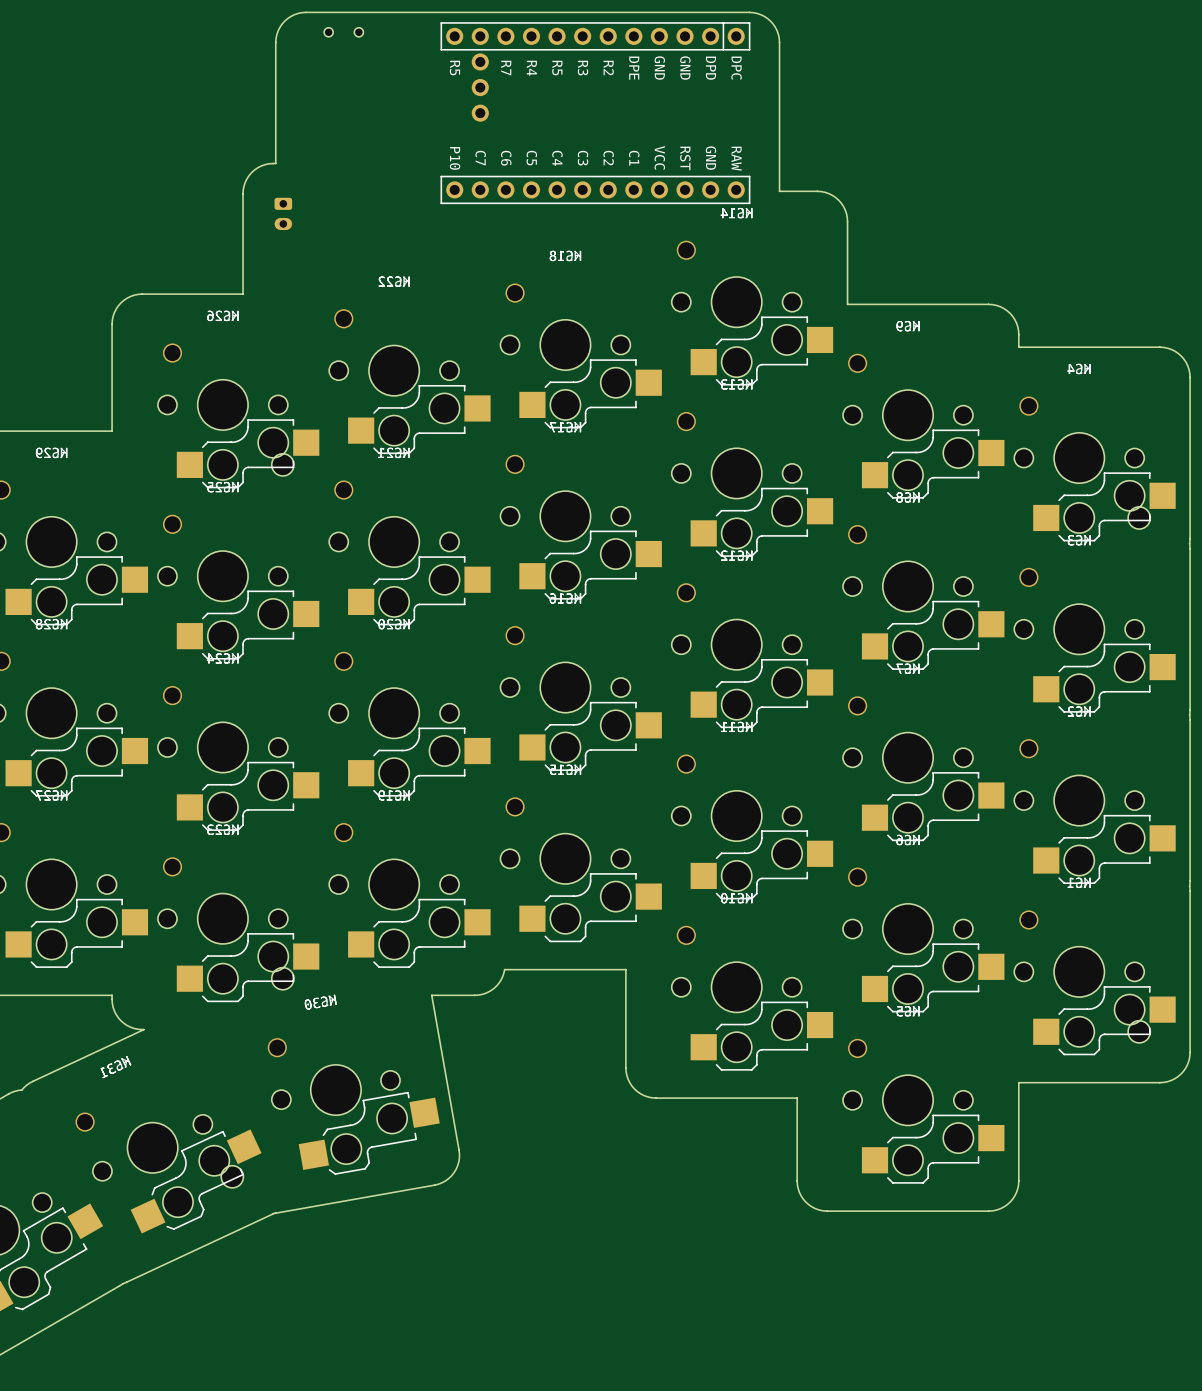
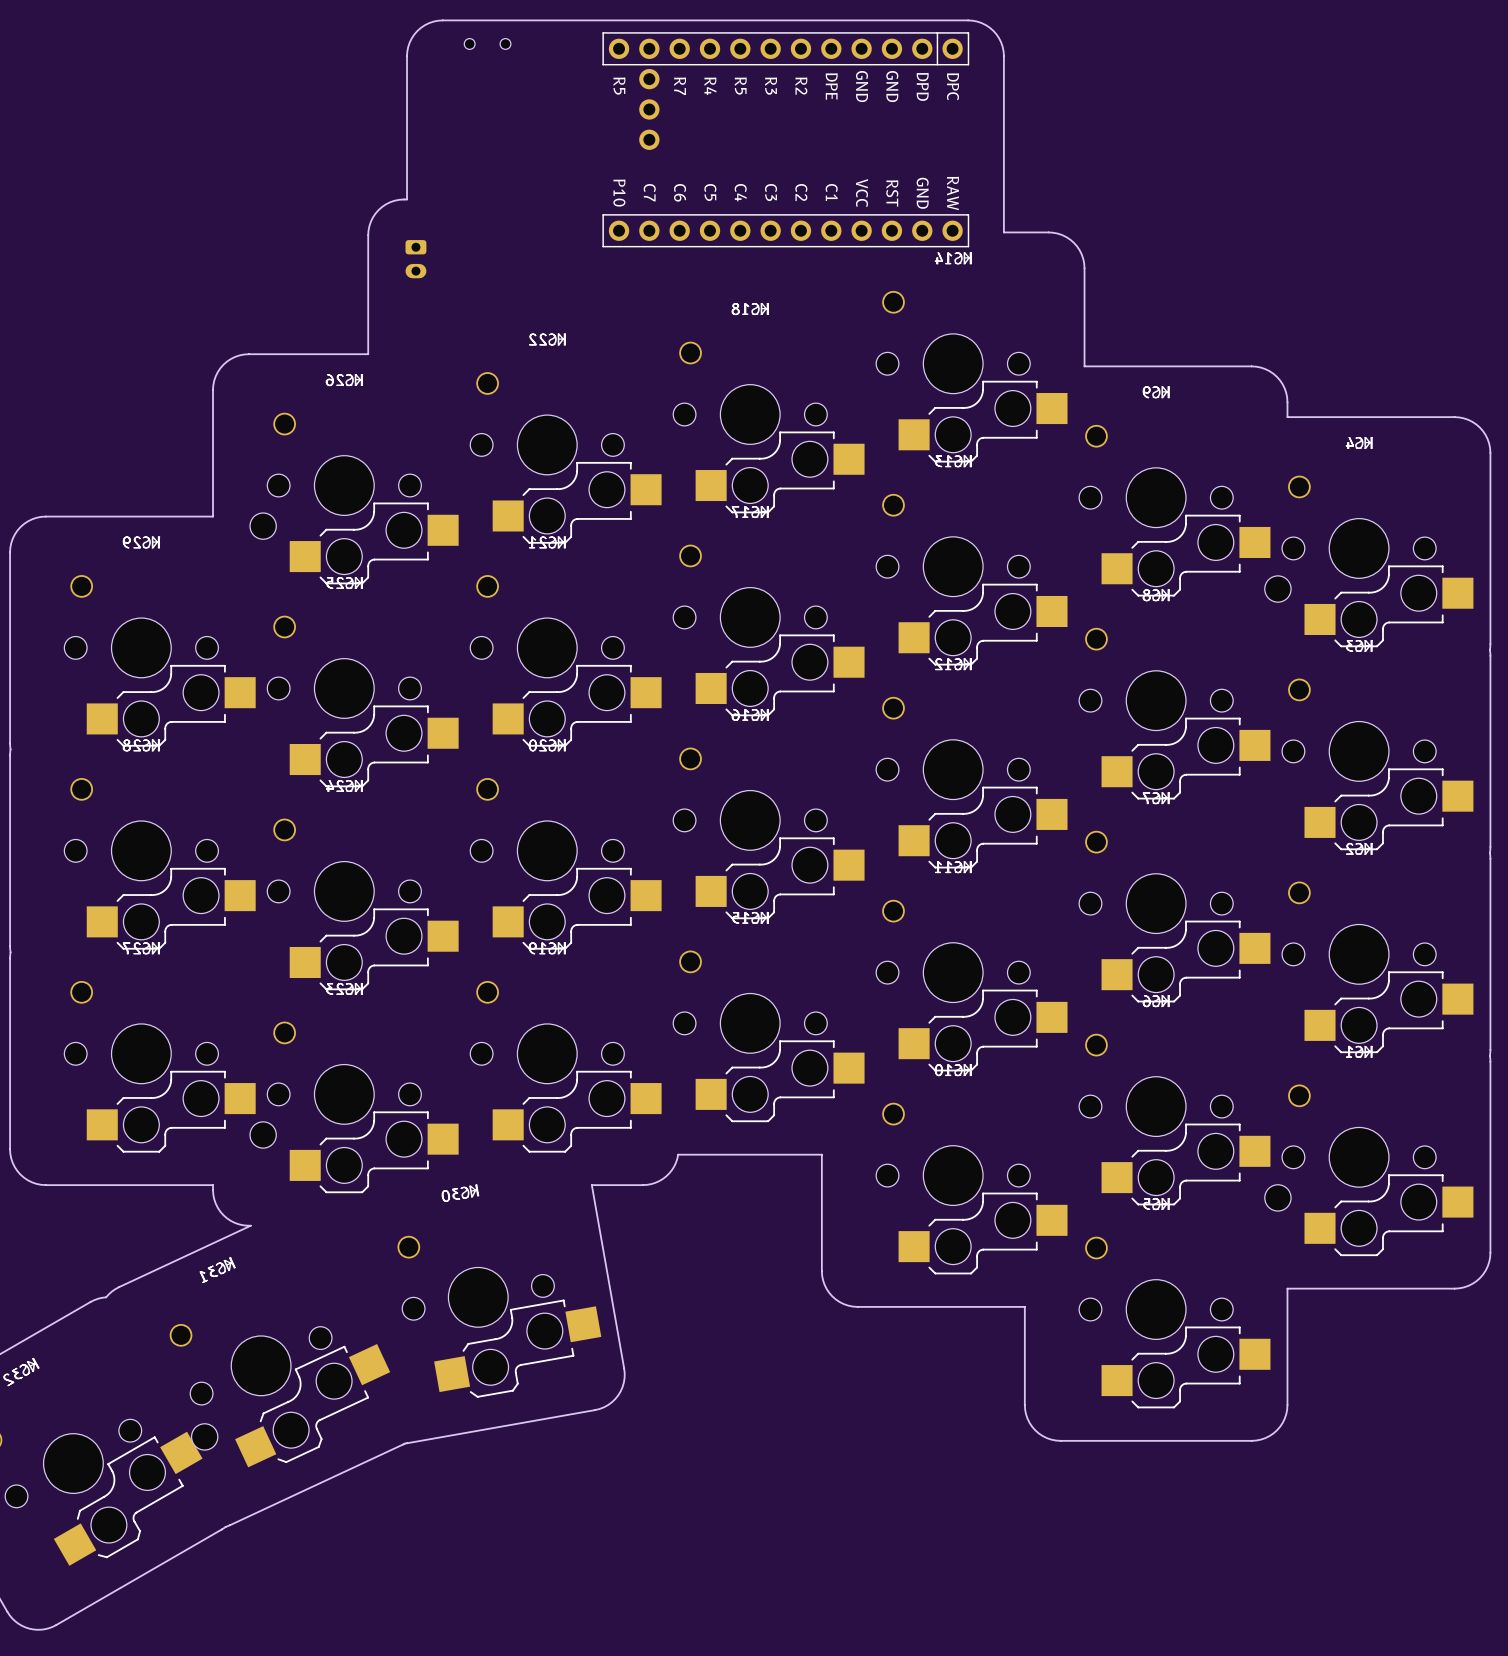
part position: (282, 464) -> (263, 526)
part position: (1139, 517) -> (1277, 589)
part: none -> (263, 1134)
part: (282, 978) -> none
part position: (1139, 1031) -> (1277, 1197)
part: (232, 1176) -> none
part: none -> (204, 1436)

